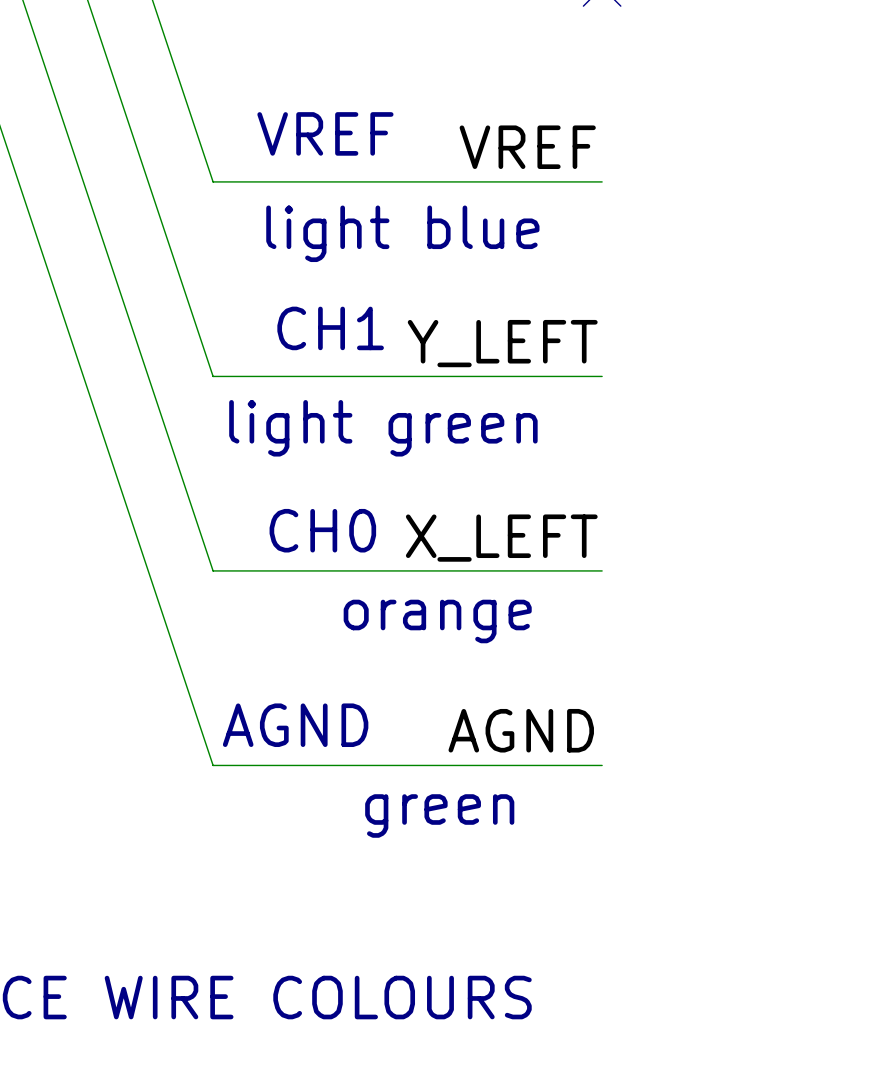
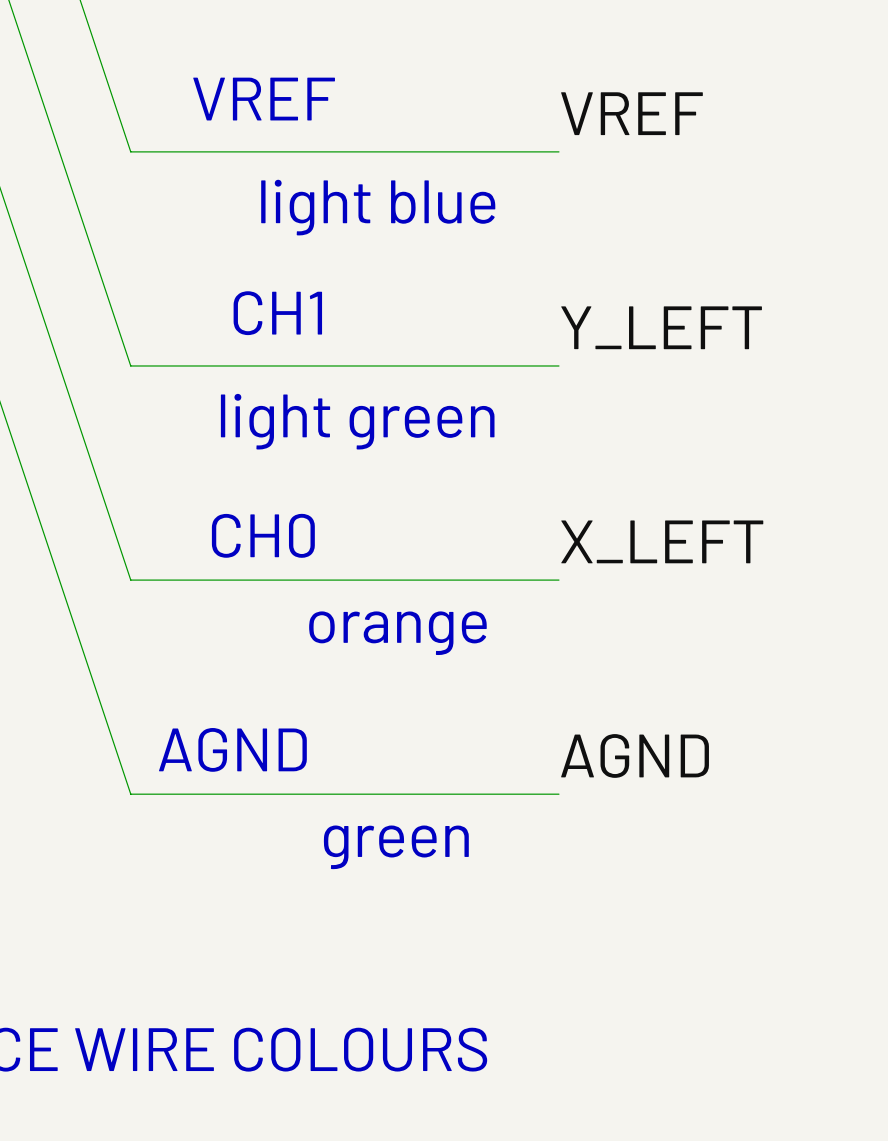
label position: VREF (527, 147) -> VREF (631, 113)
label position: Y_LEFT (502, 343) -> Y_LEFT (661, 327)
label position: X_LEFT (501, 538) -> X_LEFT (662, 541)
label position: AGND (521, 730) -> AGND (634, 755)

